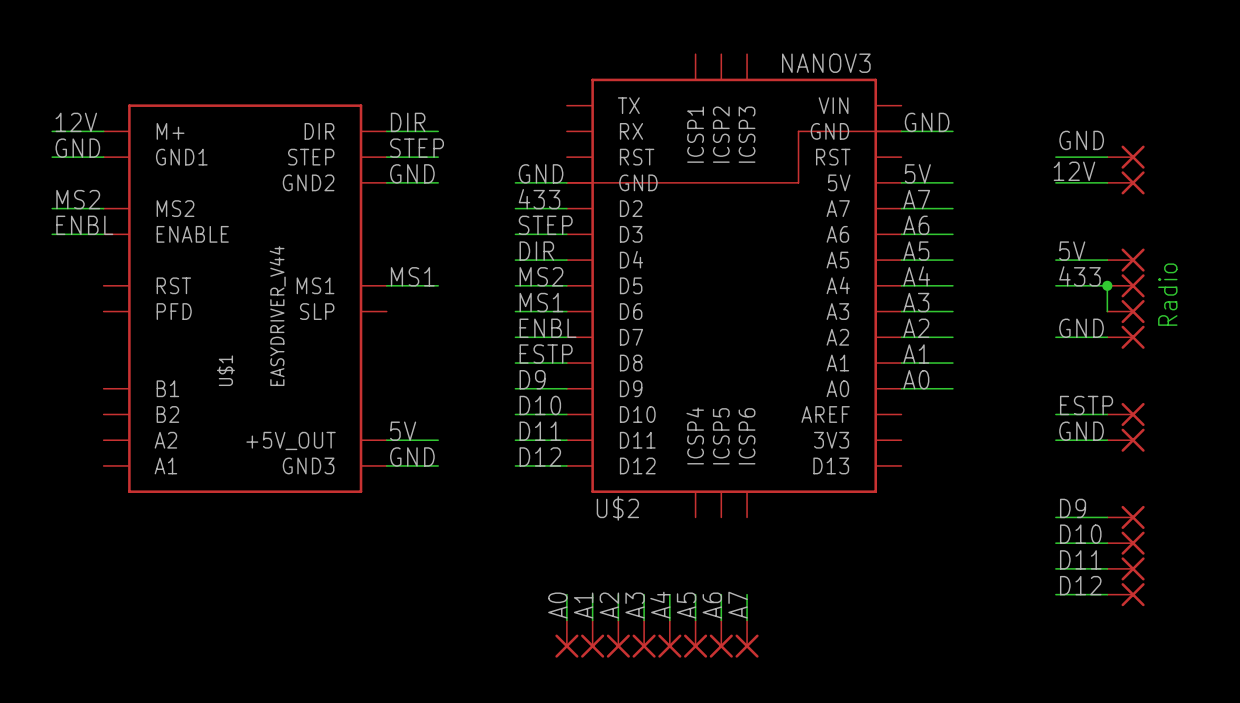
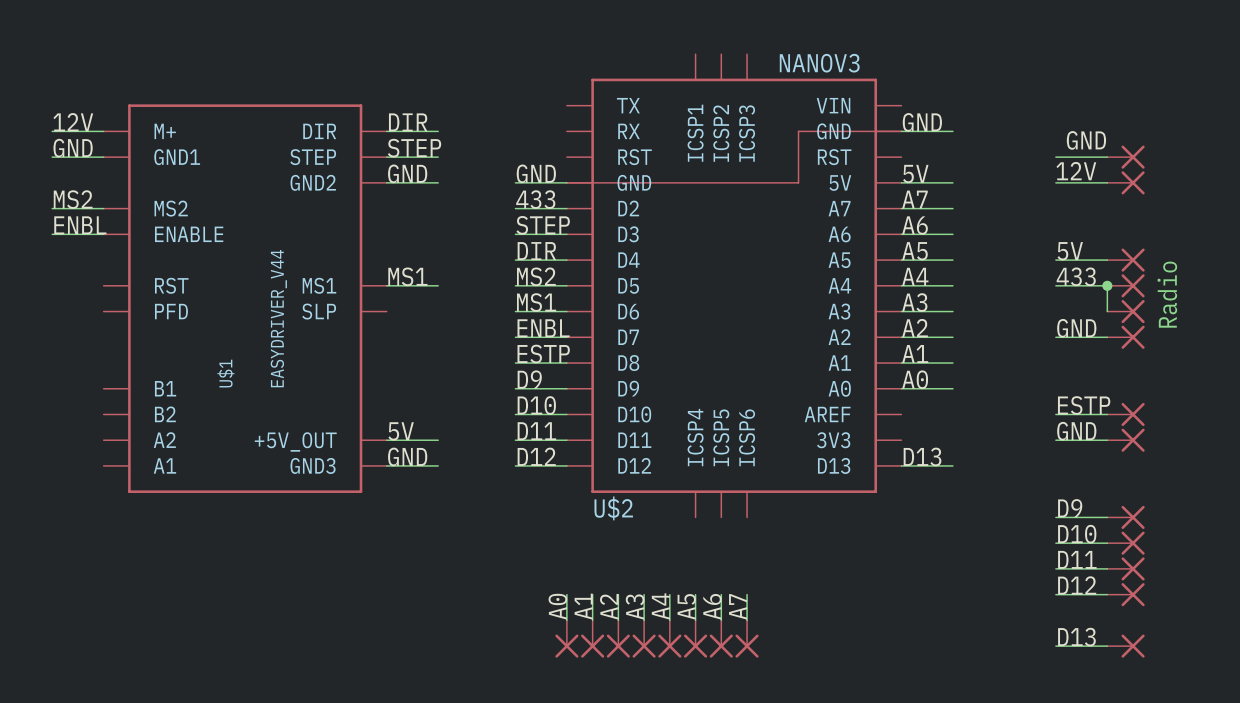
label: none -> D13 (922, 456)
wire: none -> (901, 465) (952, 465)
label: none -> D13 (1076, 637)
wire: none -> (1055, 646) (1107, 646)
part: none -> (1126, 646)

